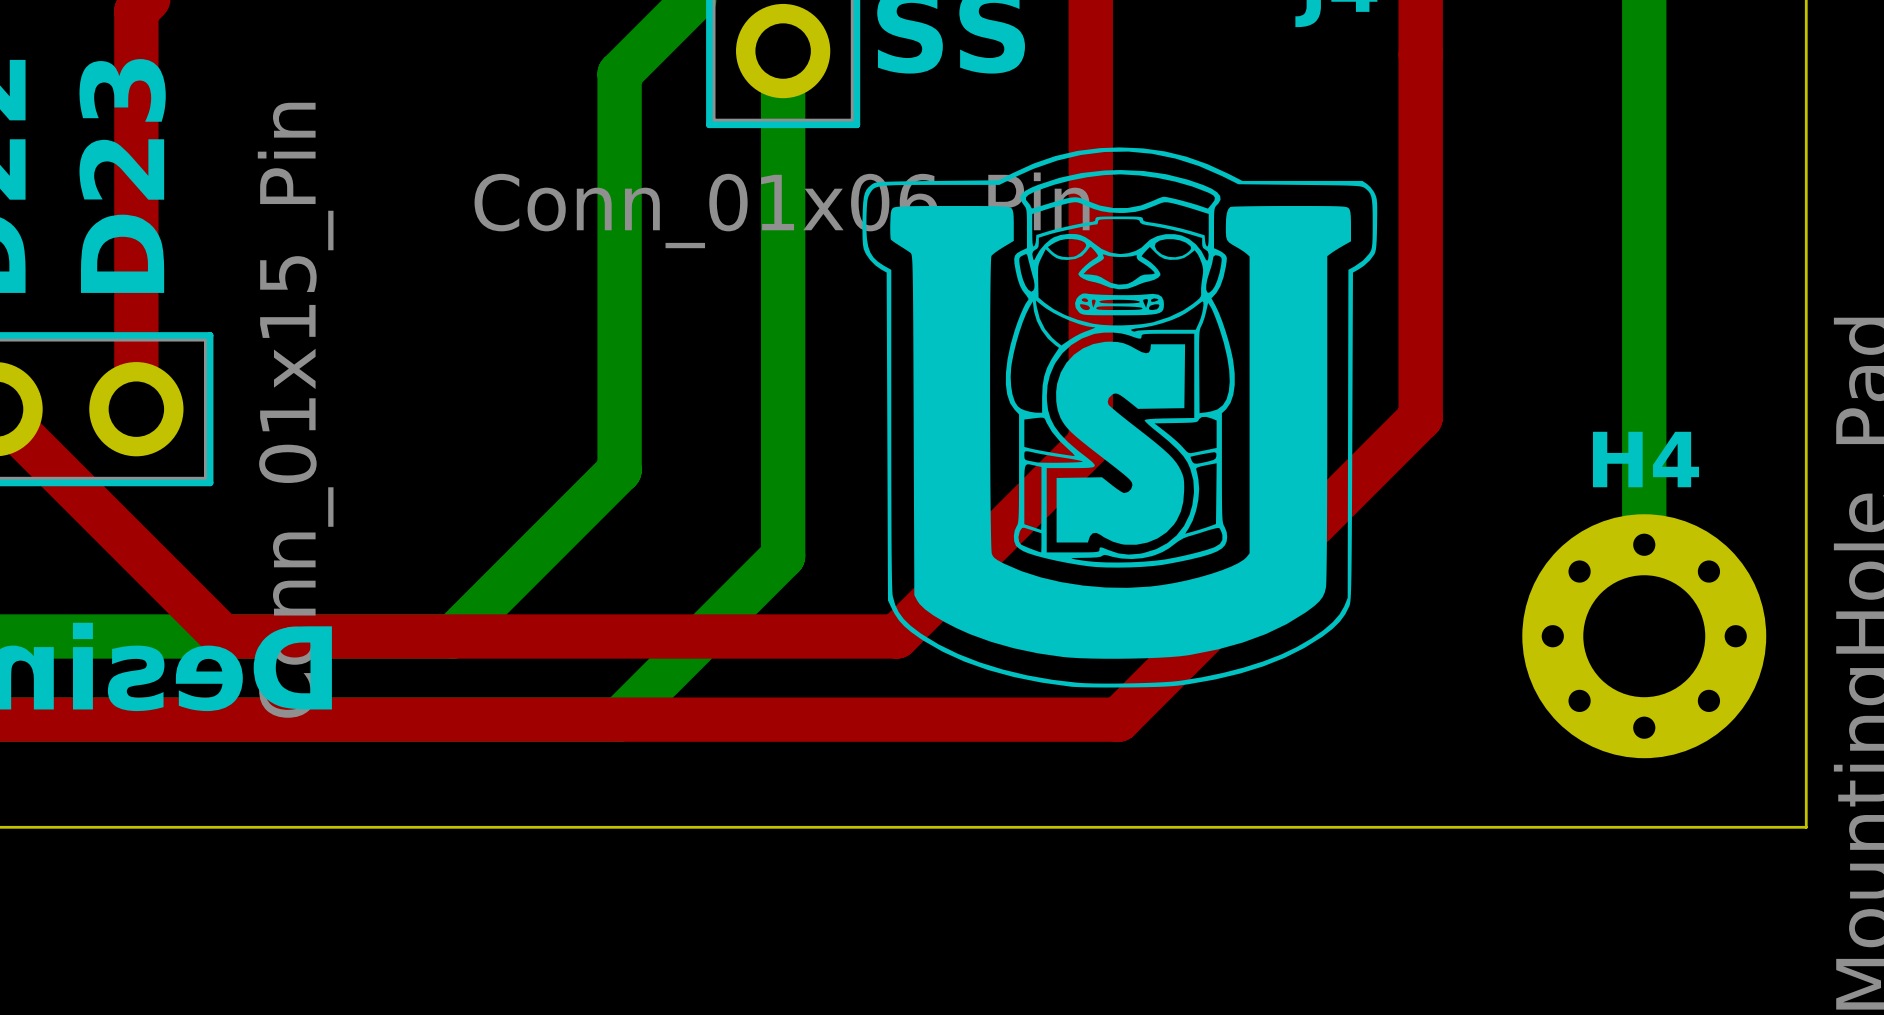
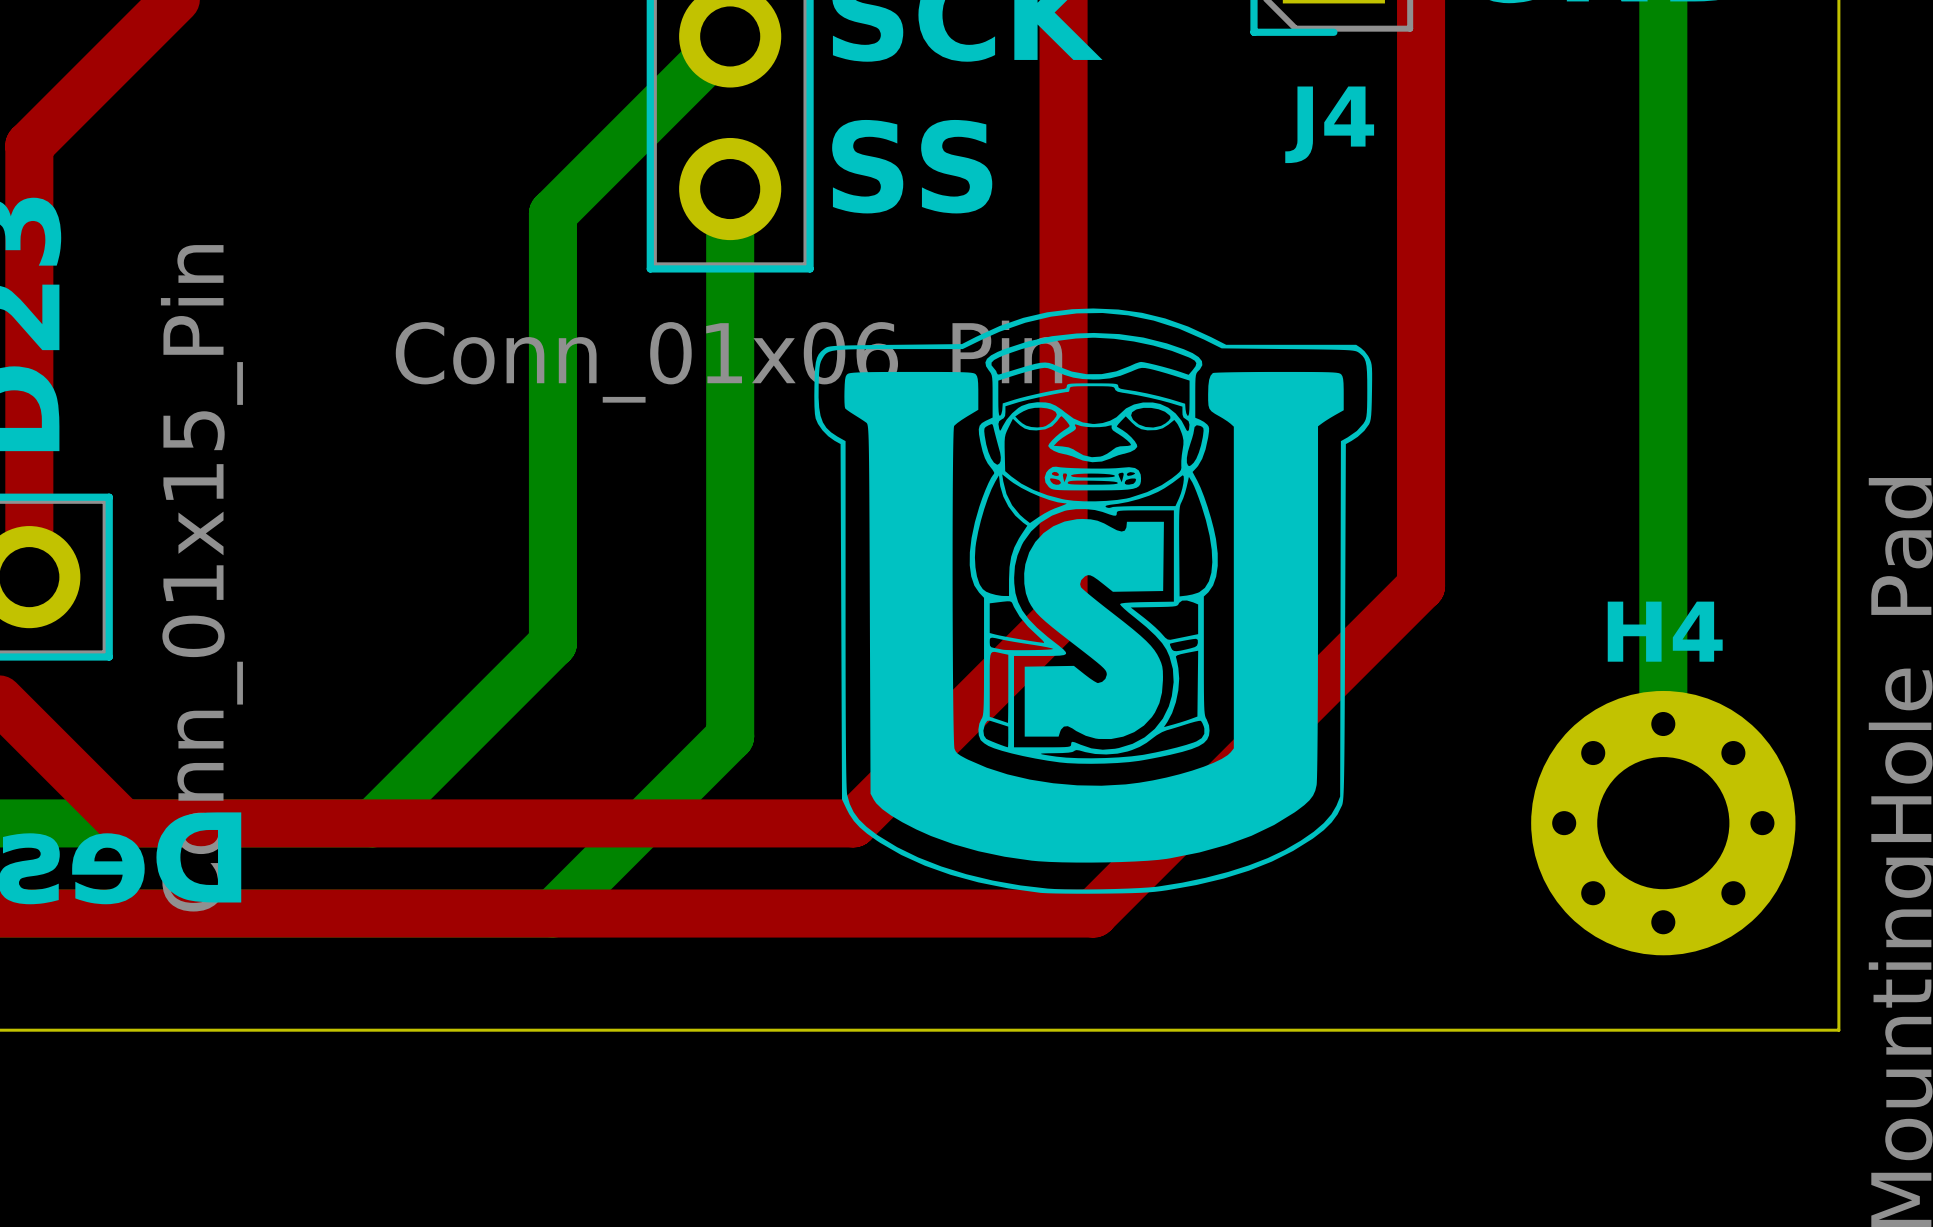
drawing position: (1119, 417) -> (1093, 601)

